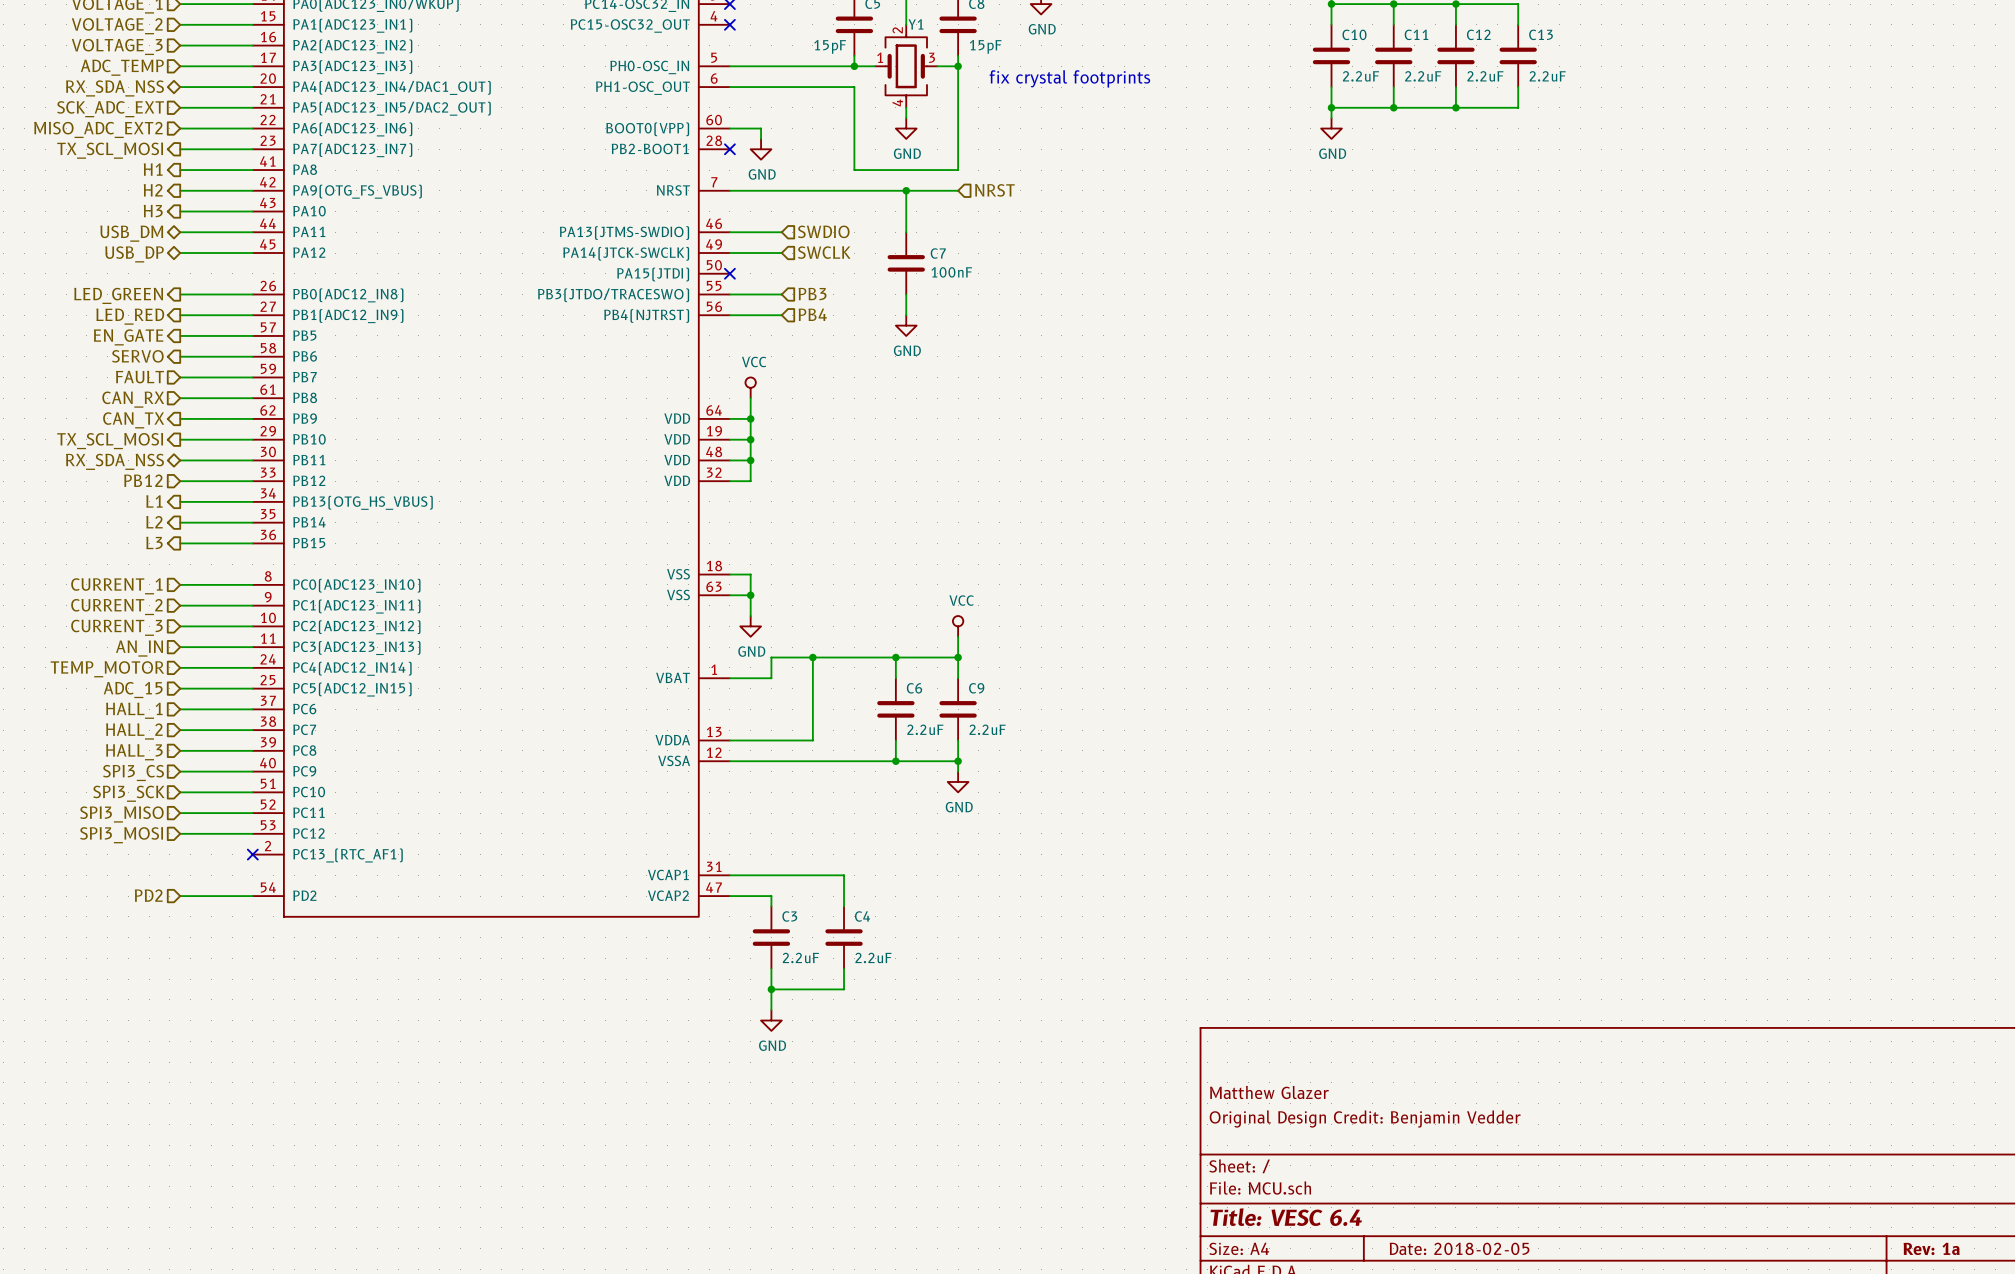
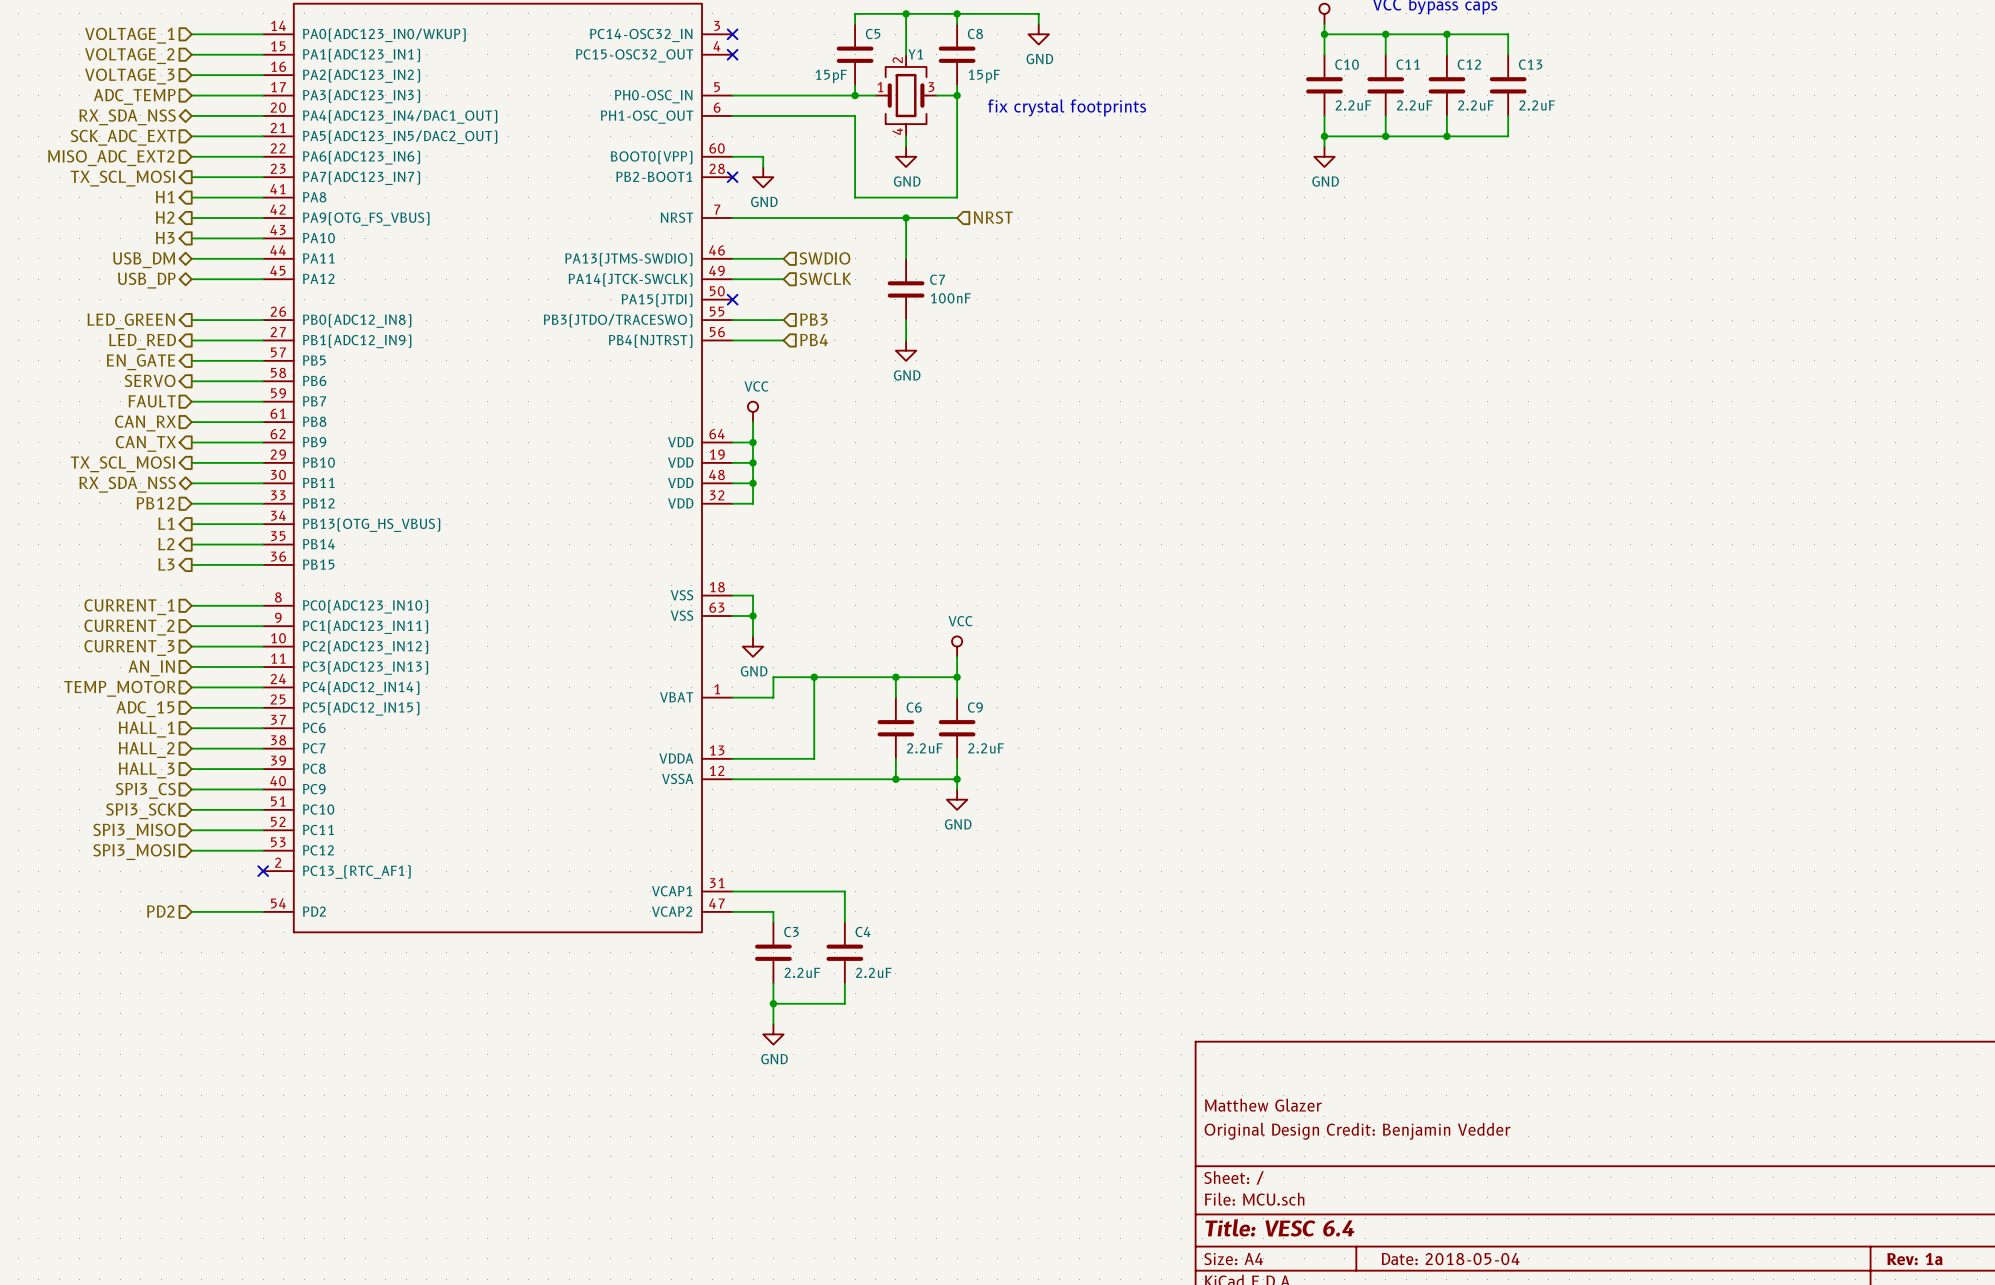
title block: Date: 2018-02-05 (1459, 1248) -> Date: 2018-05-04 (1450, 1259)

